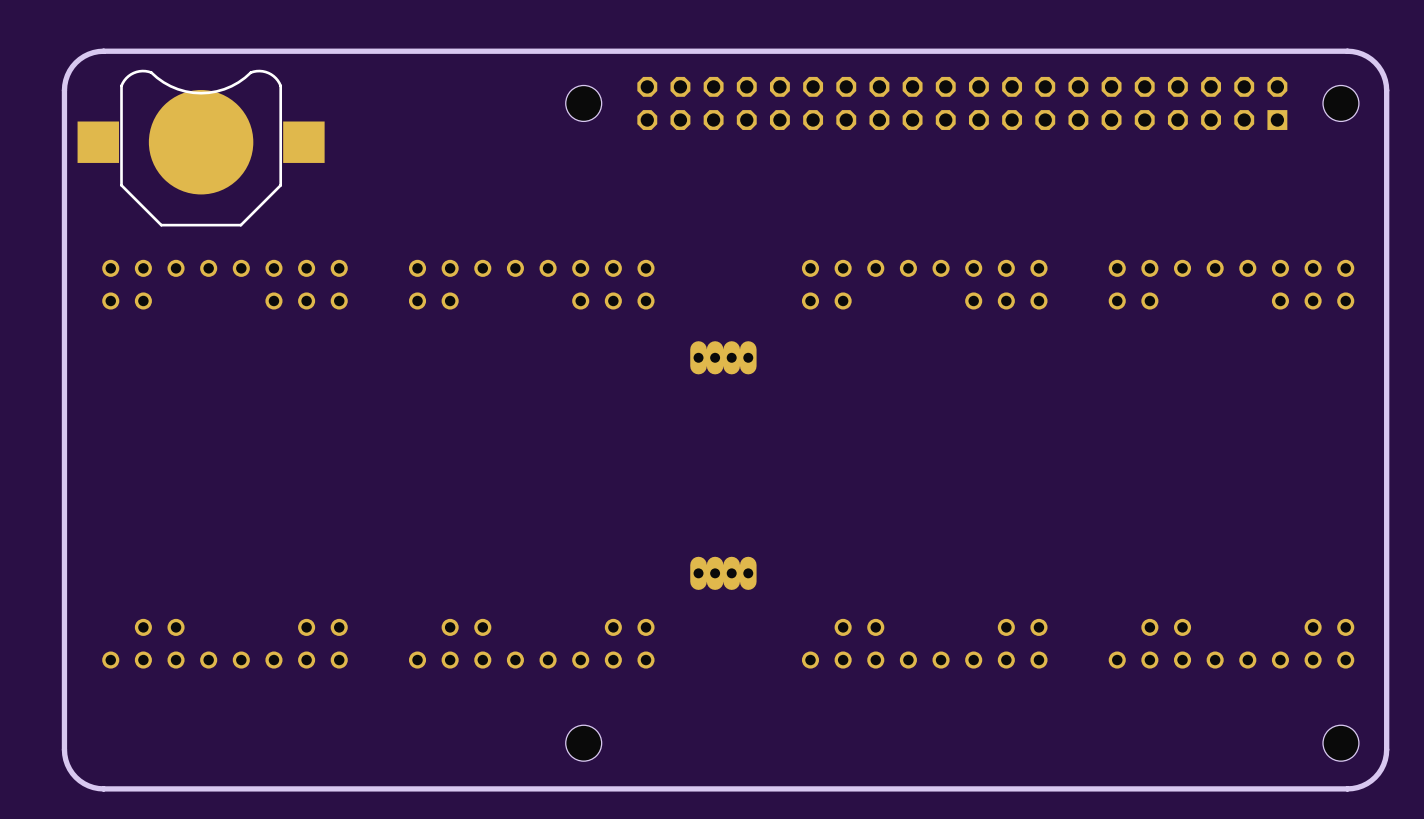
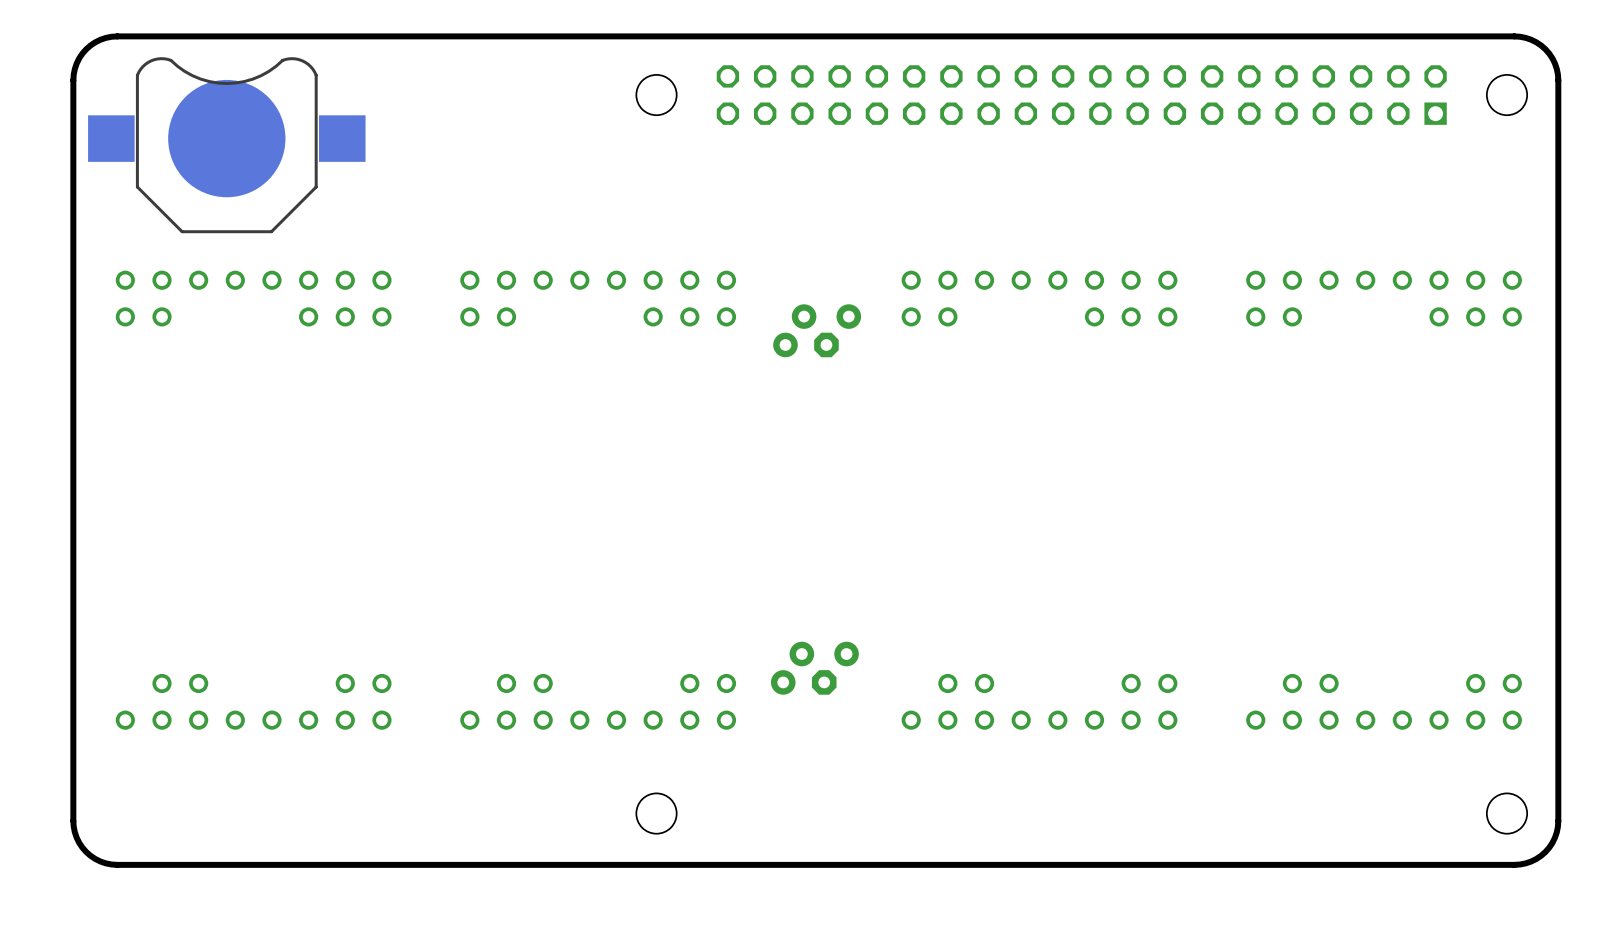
part: none -> (817, 330)
part: (723, 357) -> none
part: (723, 573) -> none
part: none -> (814, 668)

